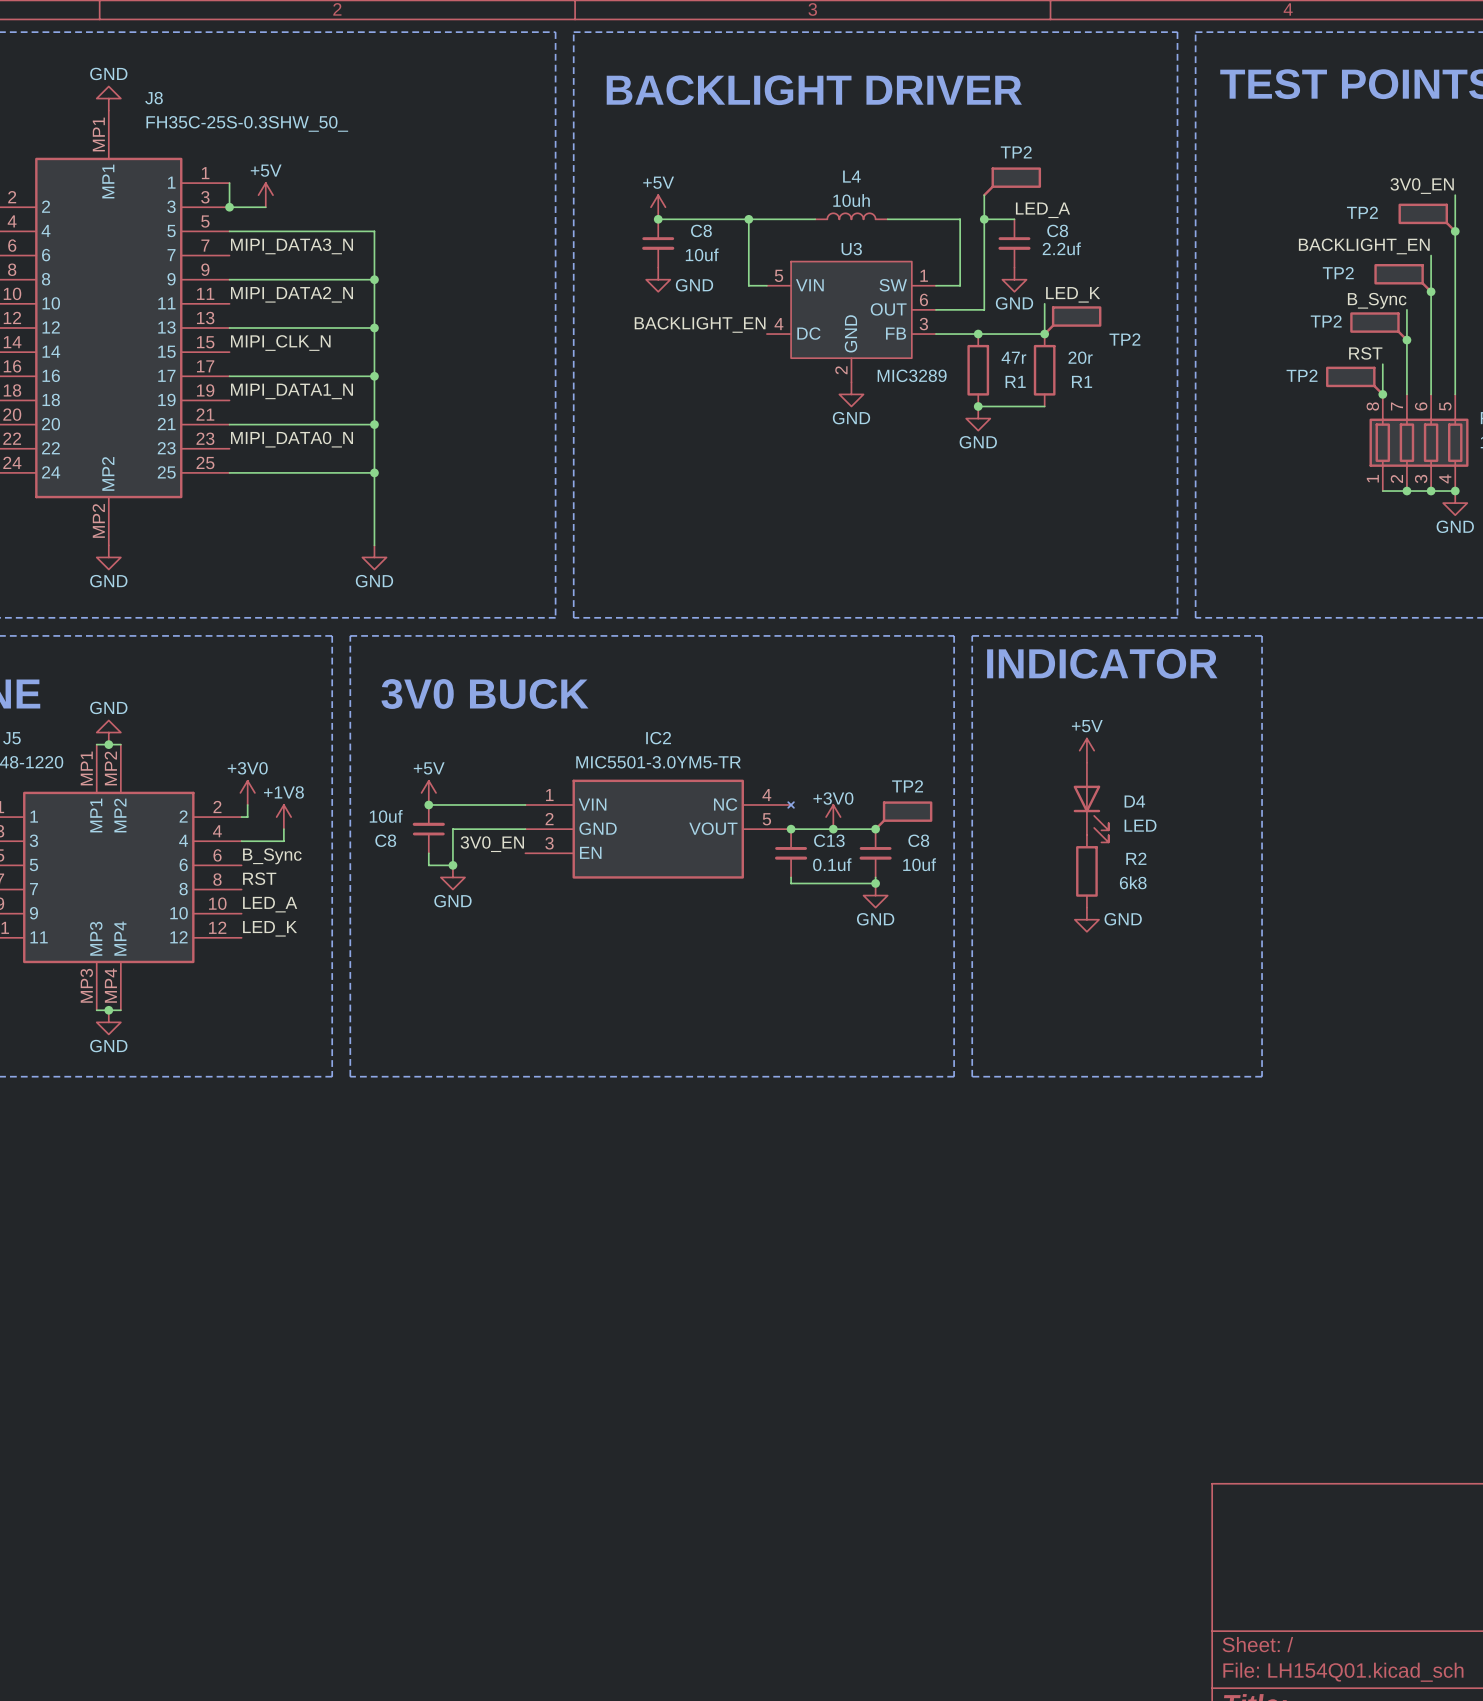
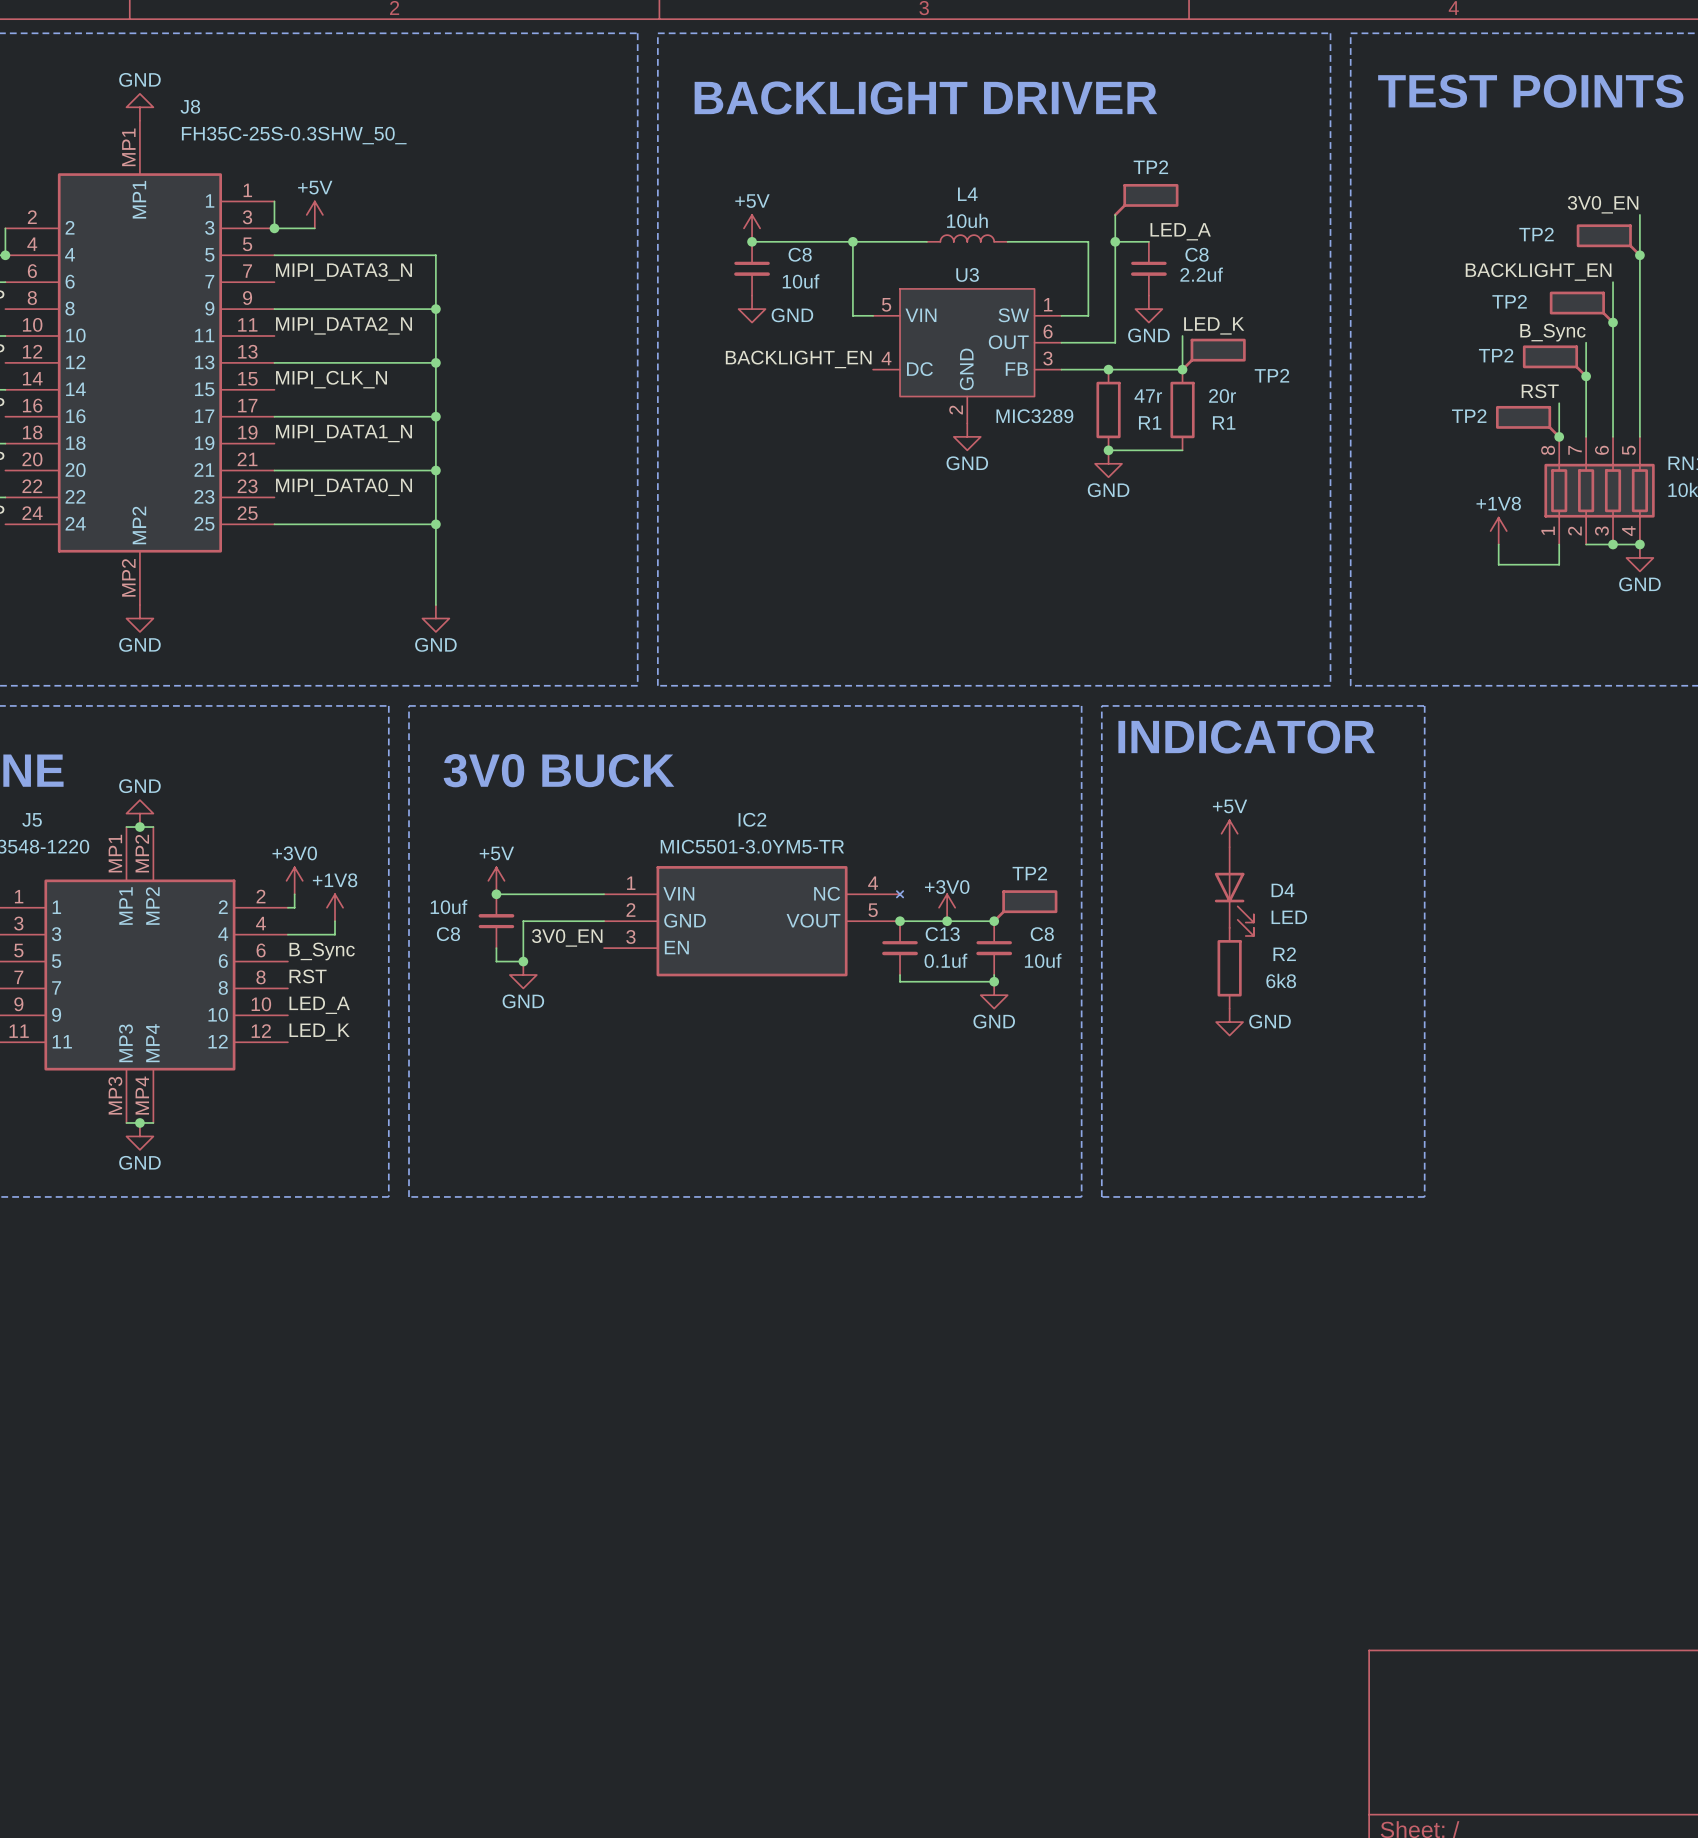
power symbol: none -> +1V8 (1498, 531)
wire: (1382, 491) (1406, 491) -> (1559, 544) (1559, 564) (1498, 564) (1498, 544)
junction: (1406, 491) -> none

